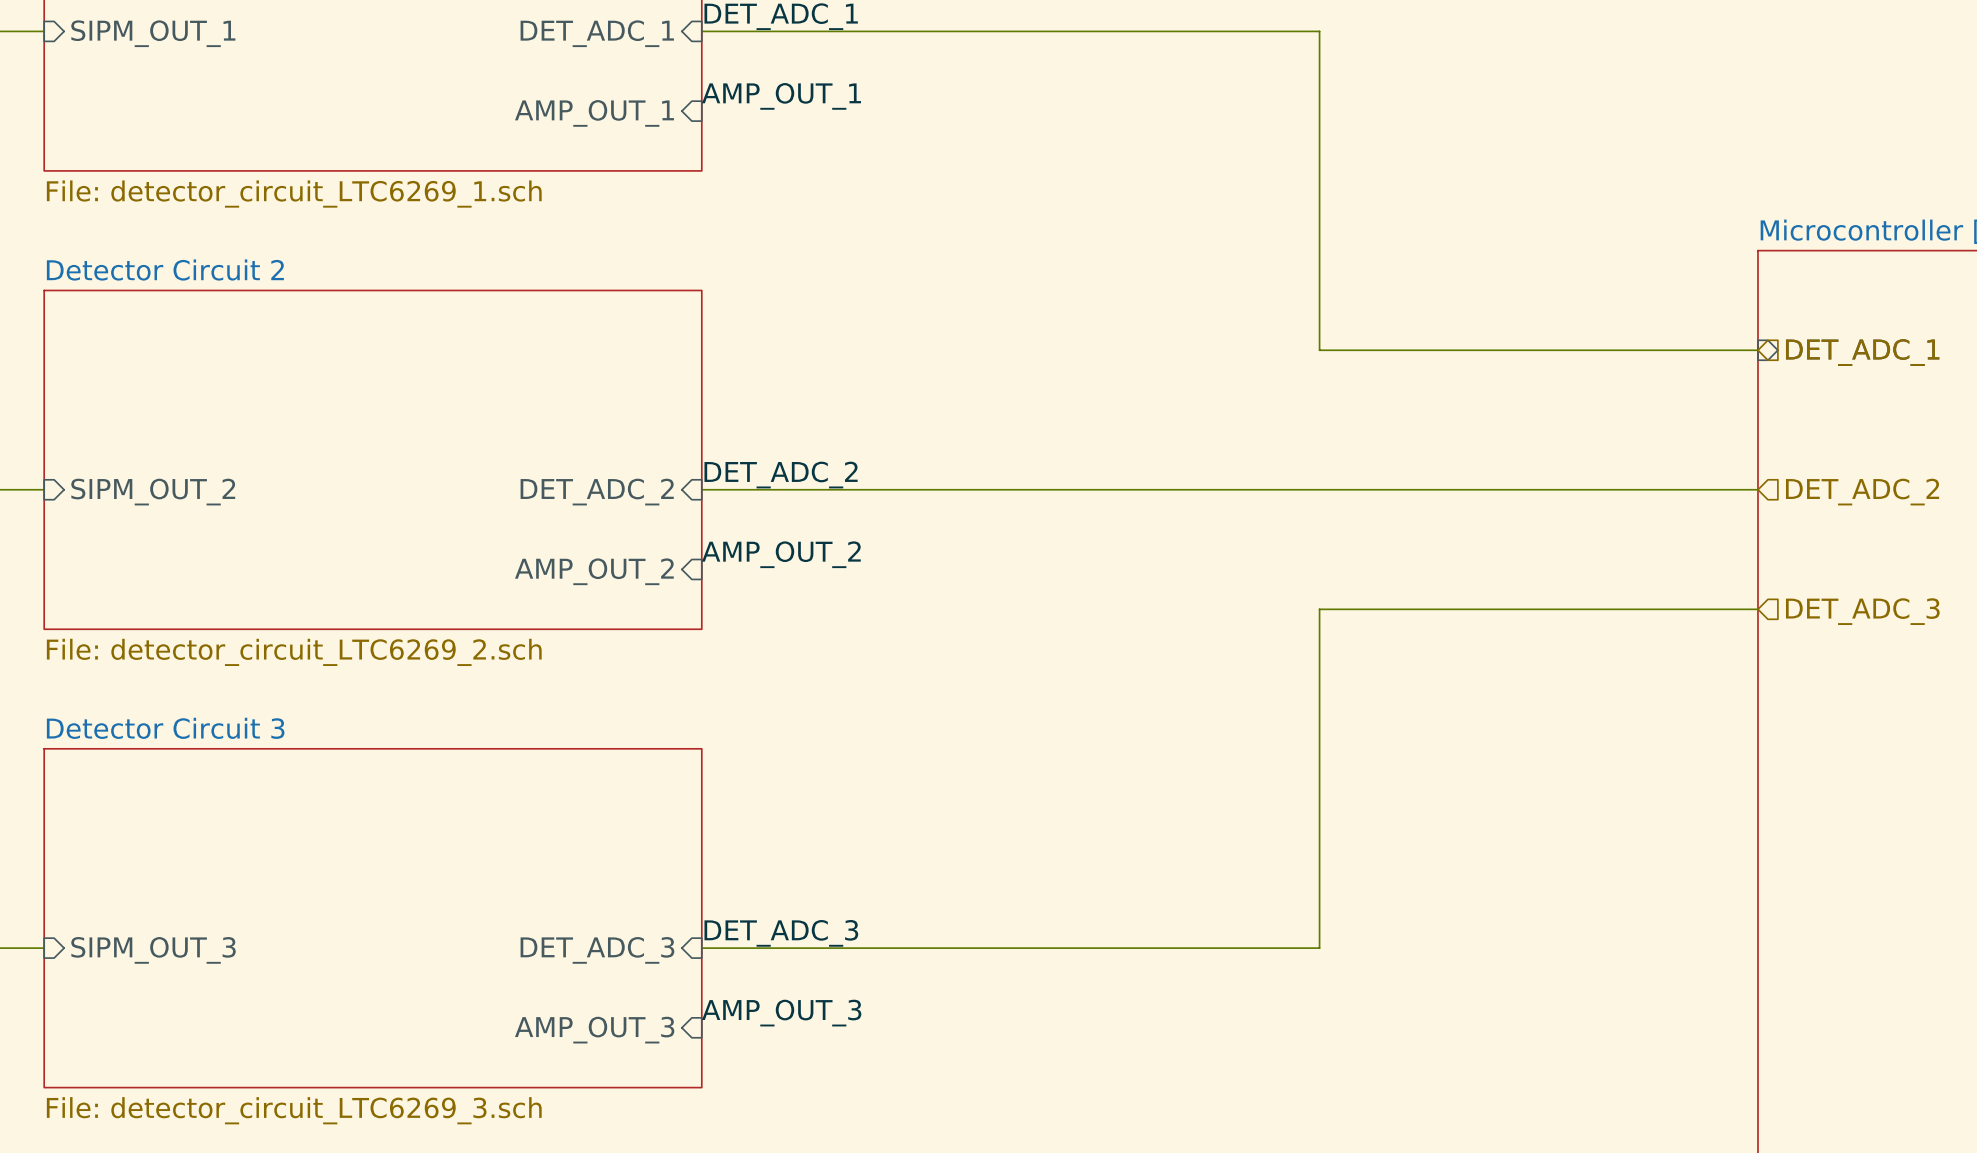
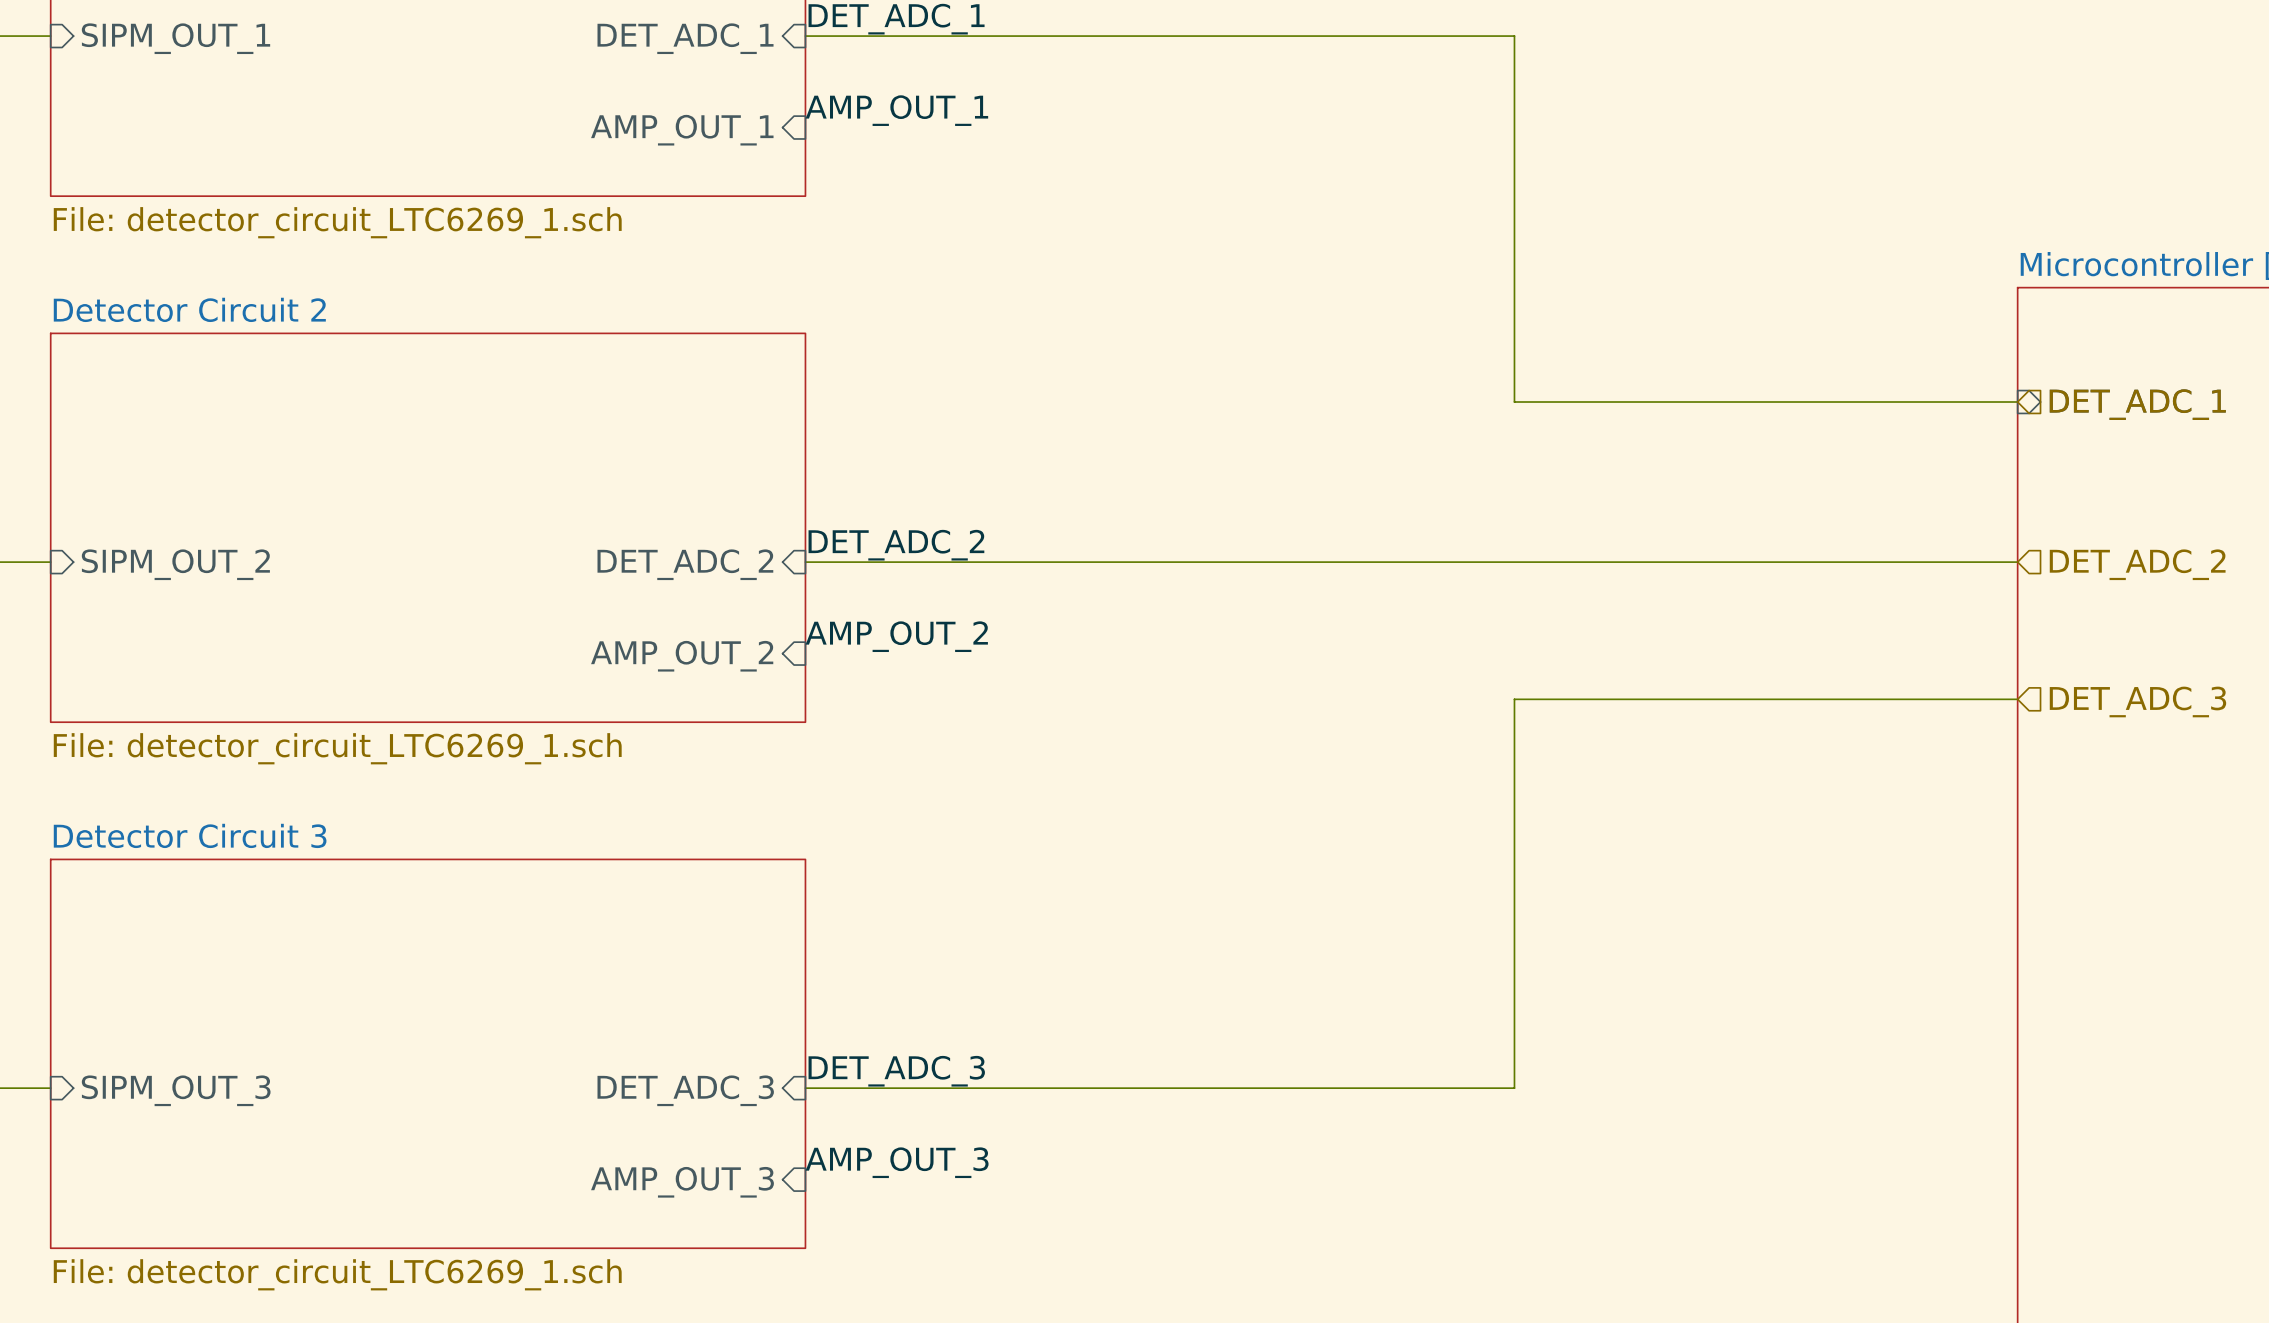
sheet Detector Circuit 2 value: File: detector_circuit_LTC6269_2.sch (294, 652) -> File: detector_circuit_LTC6269_1.sch (337, 748)
sheet Detector Circuit 3 value: File: detector_circuit_LTC6269_3.sch (294, 1110) -> File: detector_circuit_LTC6269_1.sch (337, 1274)

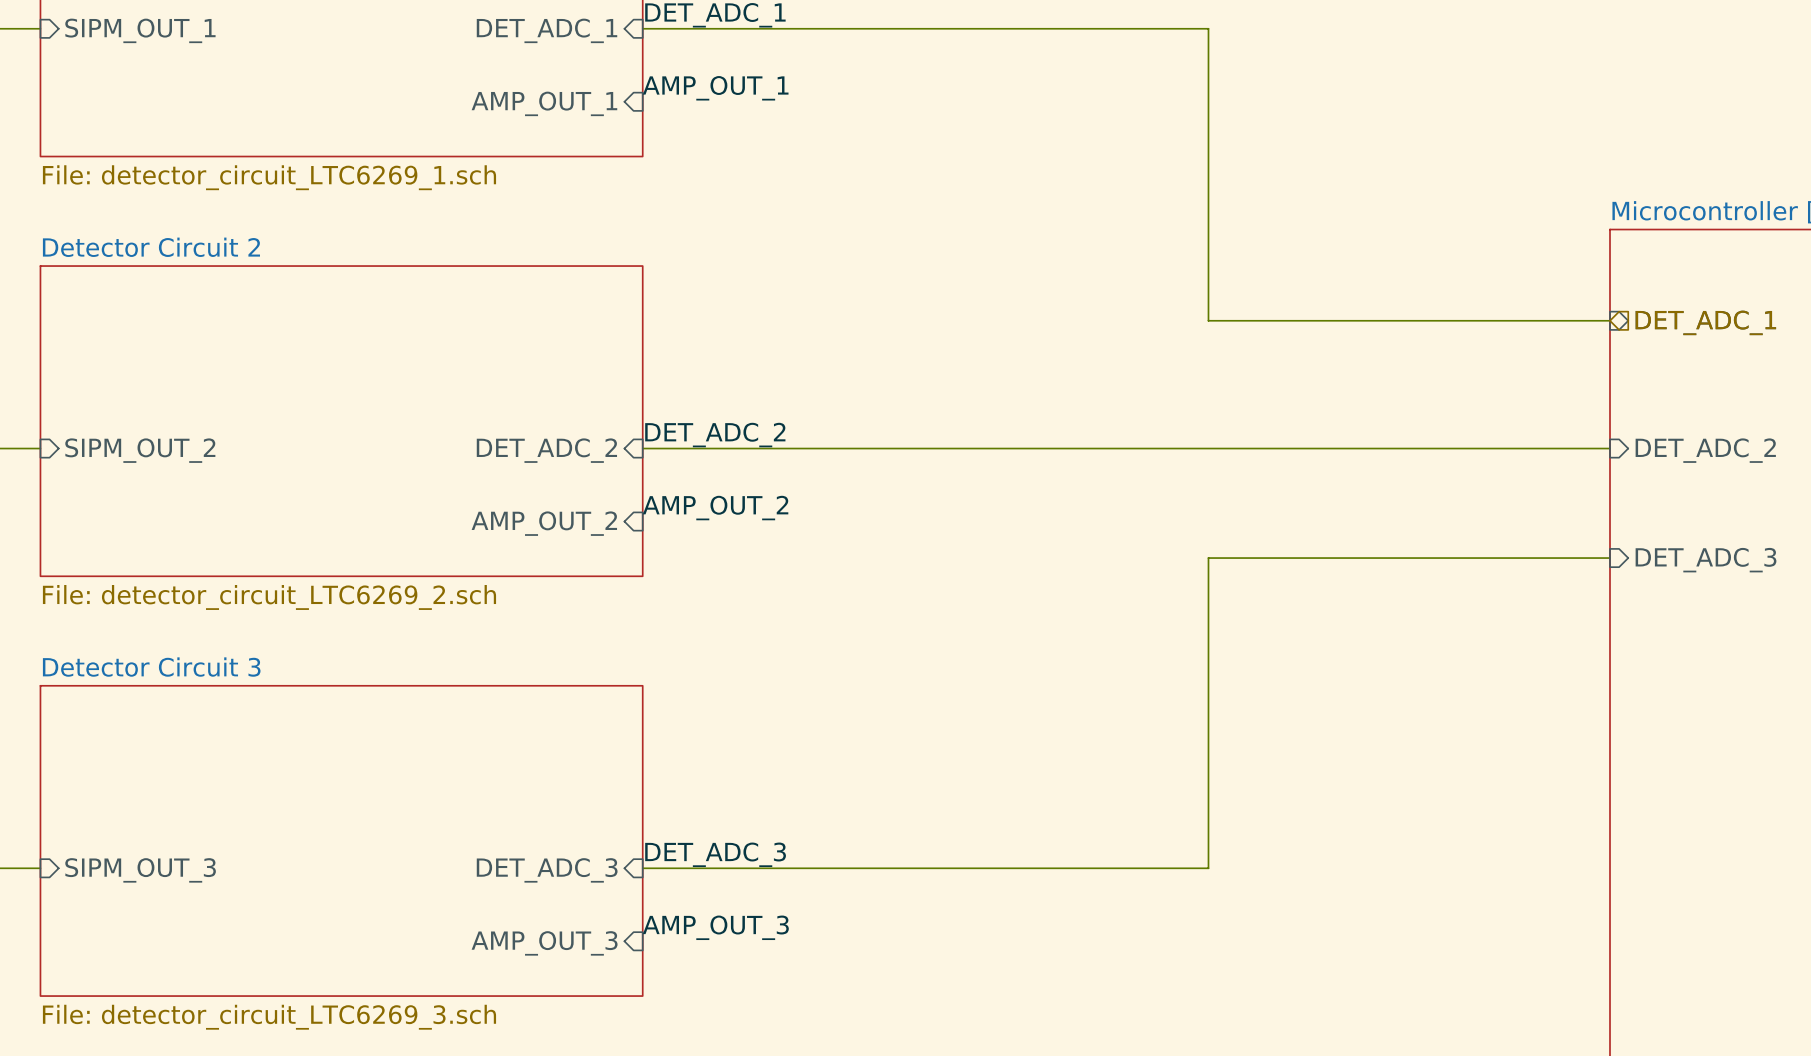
hierarchical label: DET_ADC_2 (2137, 564) -> none
sheet pin: none -> DET_ADC_2 (1705, 450)
hierarchical label: DET_ADC_3 (2137, 701) -> none
sheet pin: none -> DET_ADC_3 (1706, 560)
sheet Detector Circuit 2 value: File: detector_circuit_LTC6269_1.sch (337, 748) -> File: detector_circuit_LTC6269_2.sch (269, 597)
sheet Detector Circuit 3 value: File: detector_circuit_LTC6269_1.sch (337, 1274) -> File: detector_circuit_LTC6269_3.sch (269, 1017)

